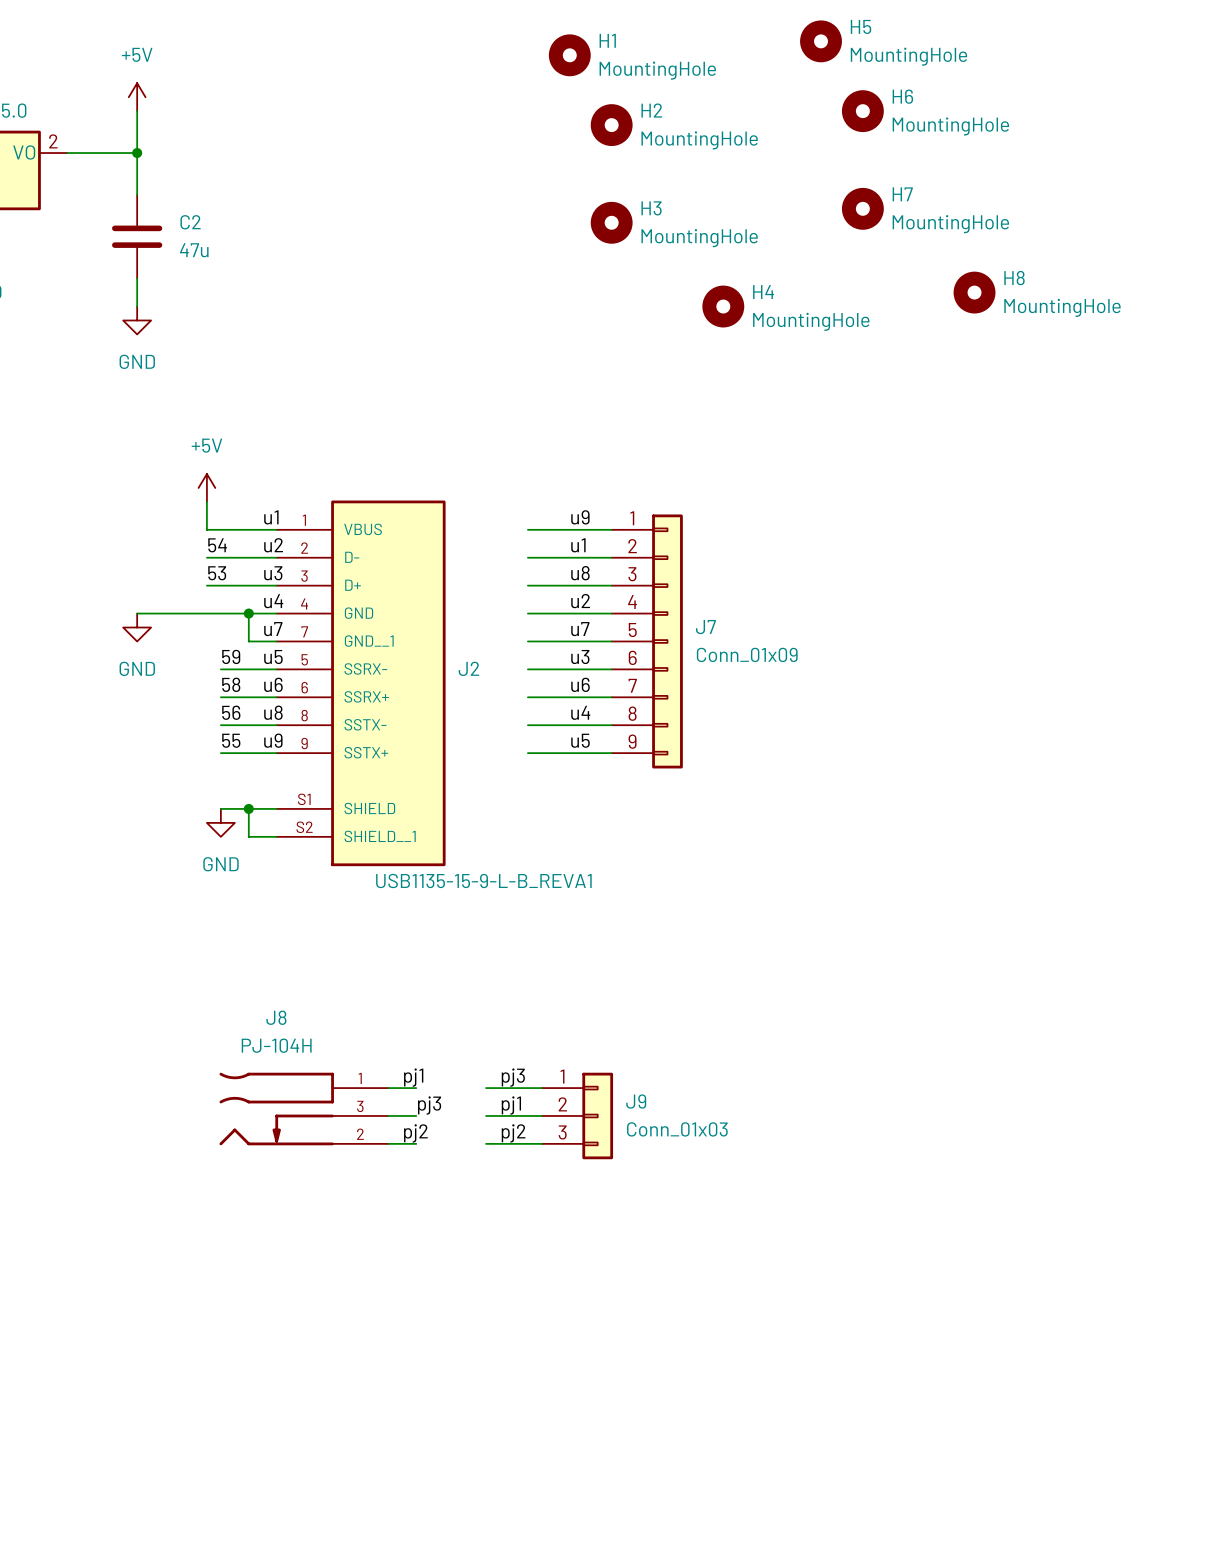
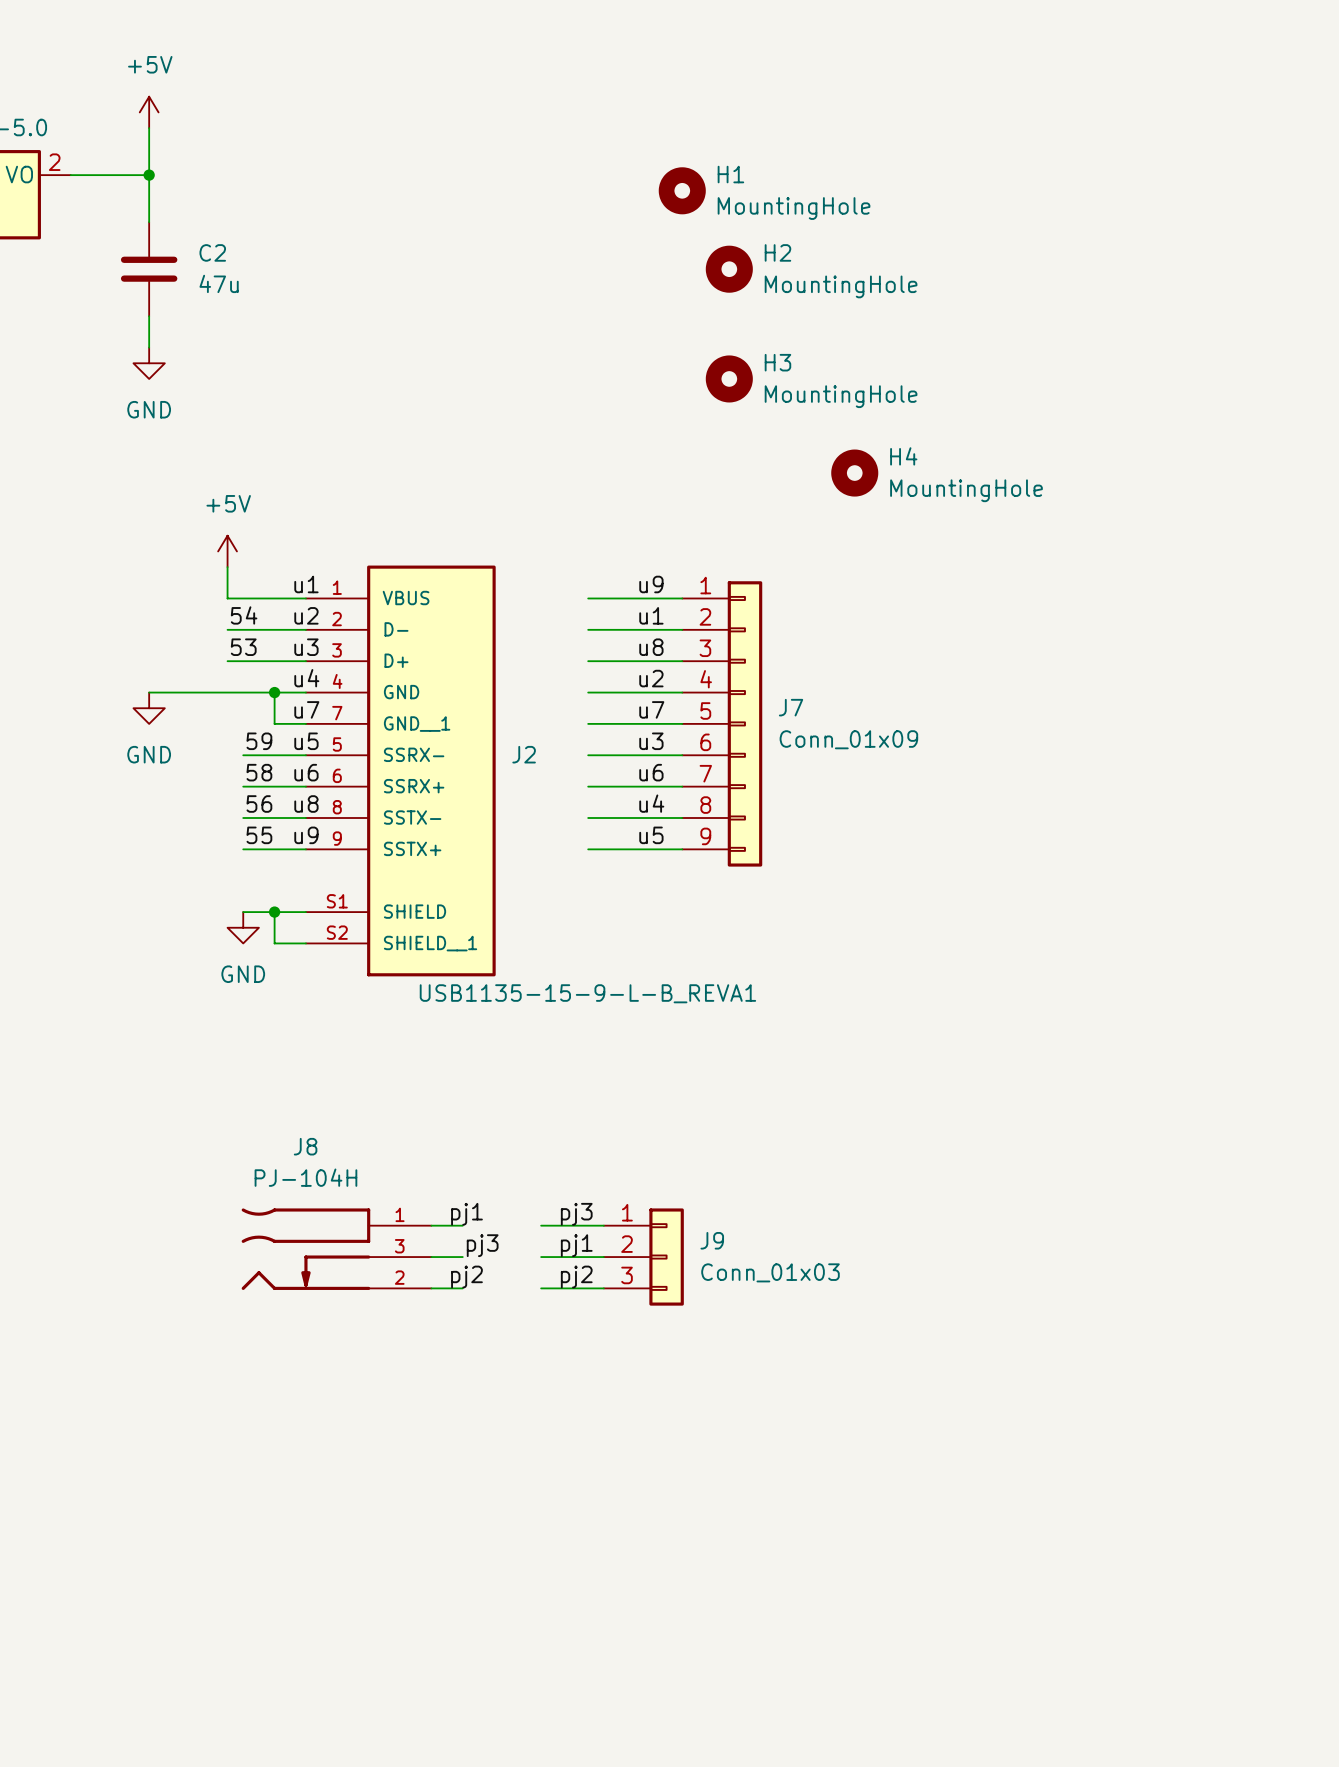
H5: MountingHole (821, 41) -> none
H1 position: (569, 55) -> (682, 190)
H6: MountingHole (862, 111) -> none
H2 position: (611, 125) -> (729, 269)
H7: MountingHole (862, 208) -> none
H3 position: (611, 222) -> (729, 378)
H8: MountingHole (974, 292) -> none
H4 position: (723, 306) -> (854, 473)

